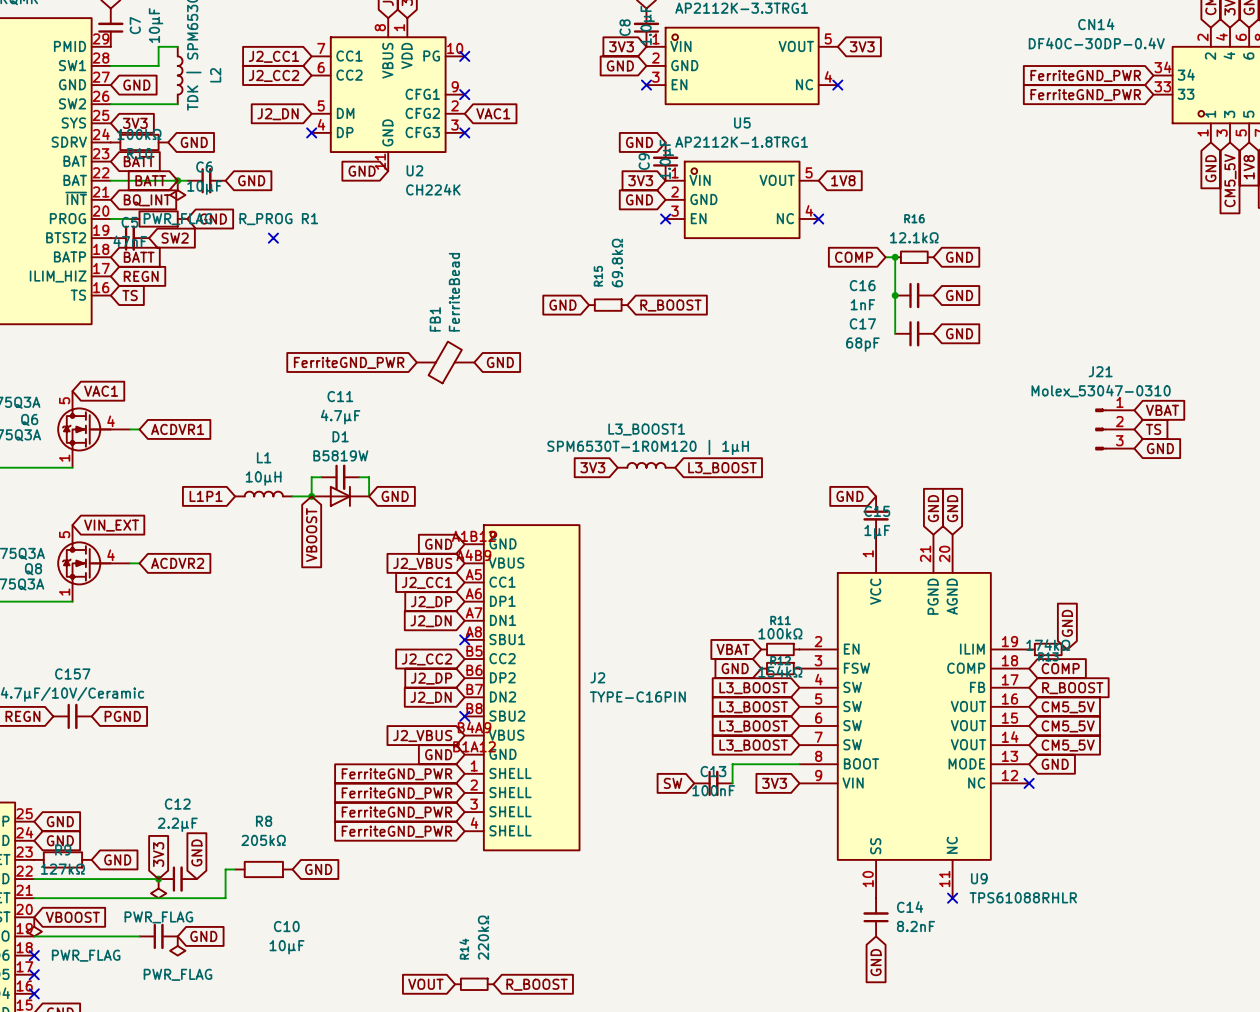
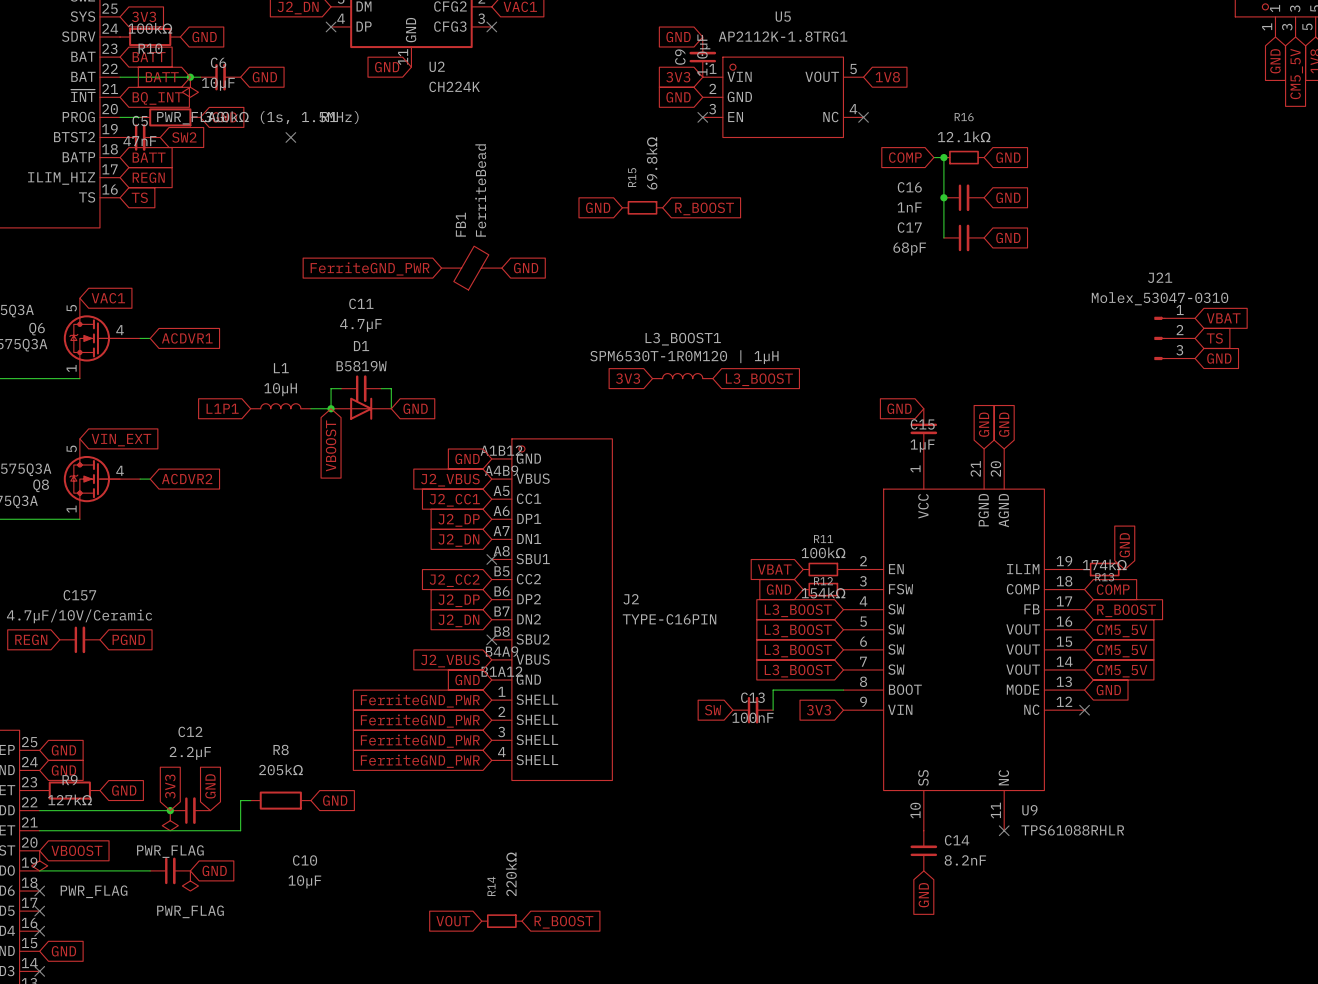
R1 value: R_PROG (265, 219) -> 3.0kΩ (1s, 1.5MHz) (281, 117)

